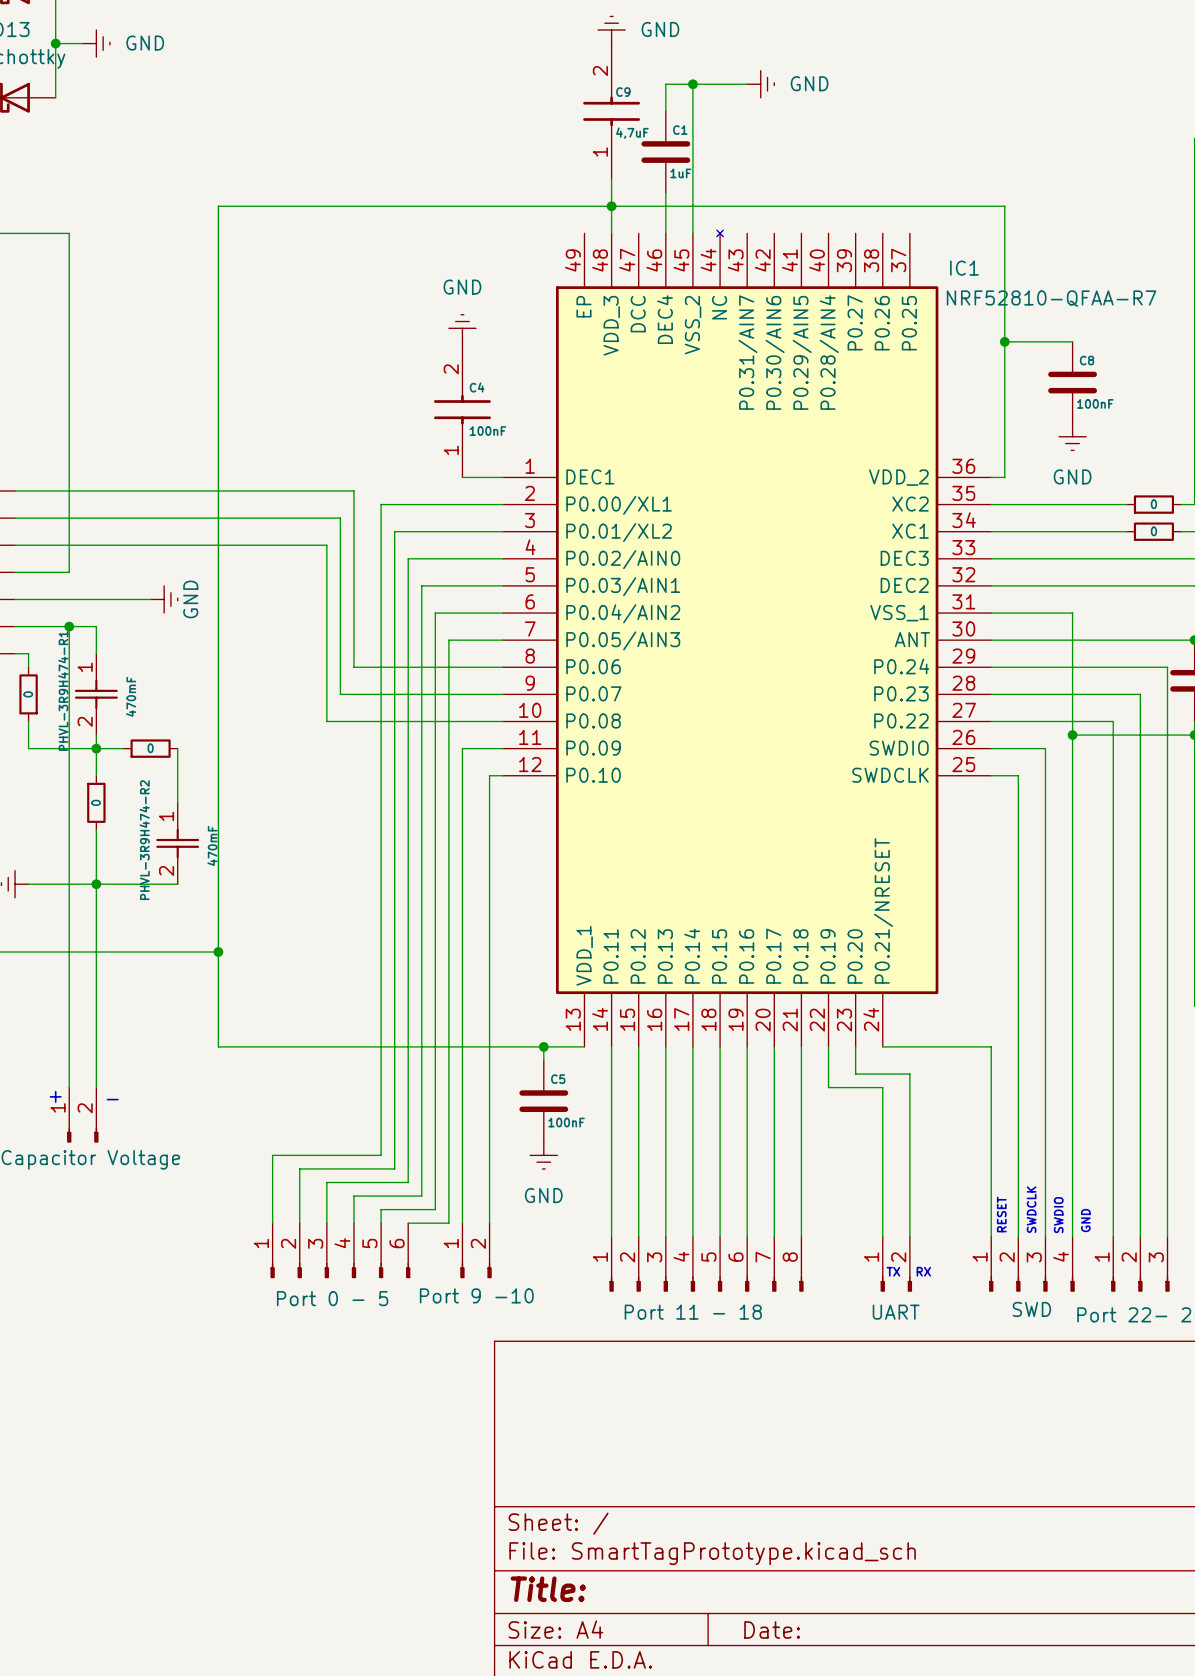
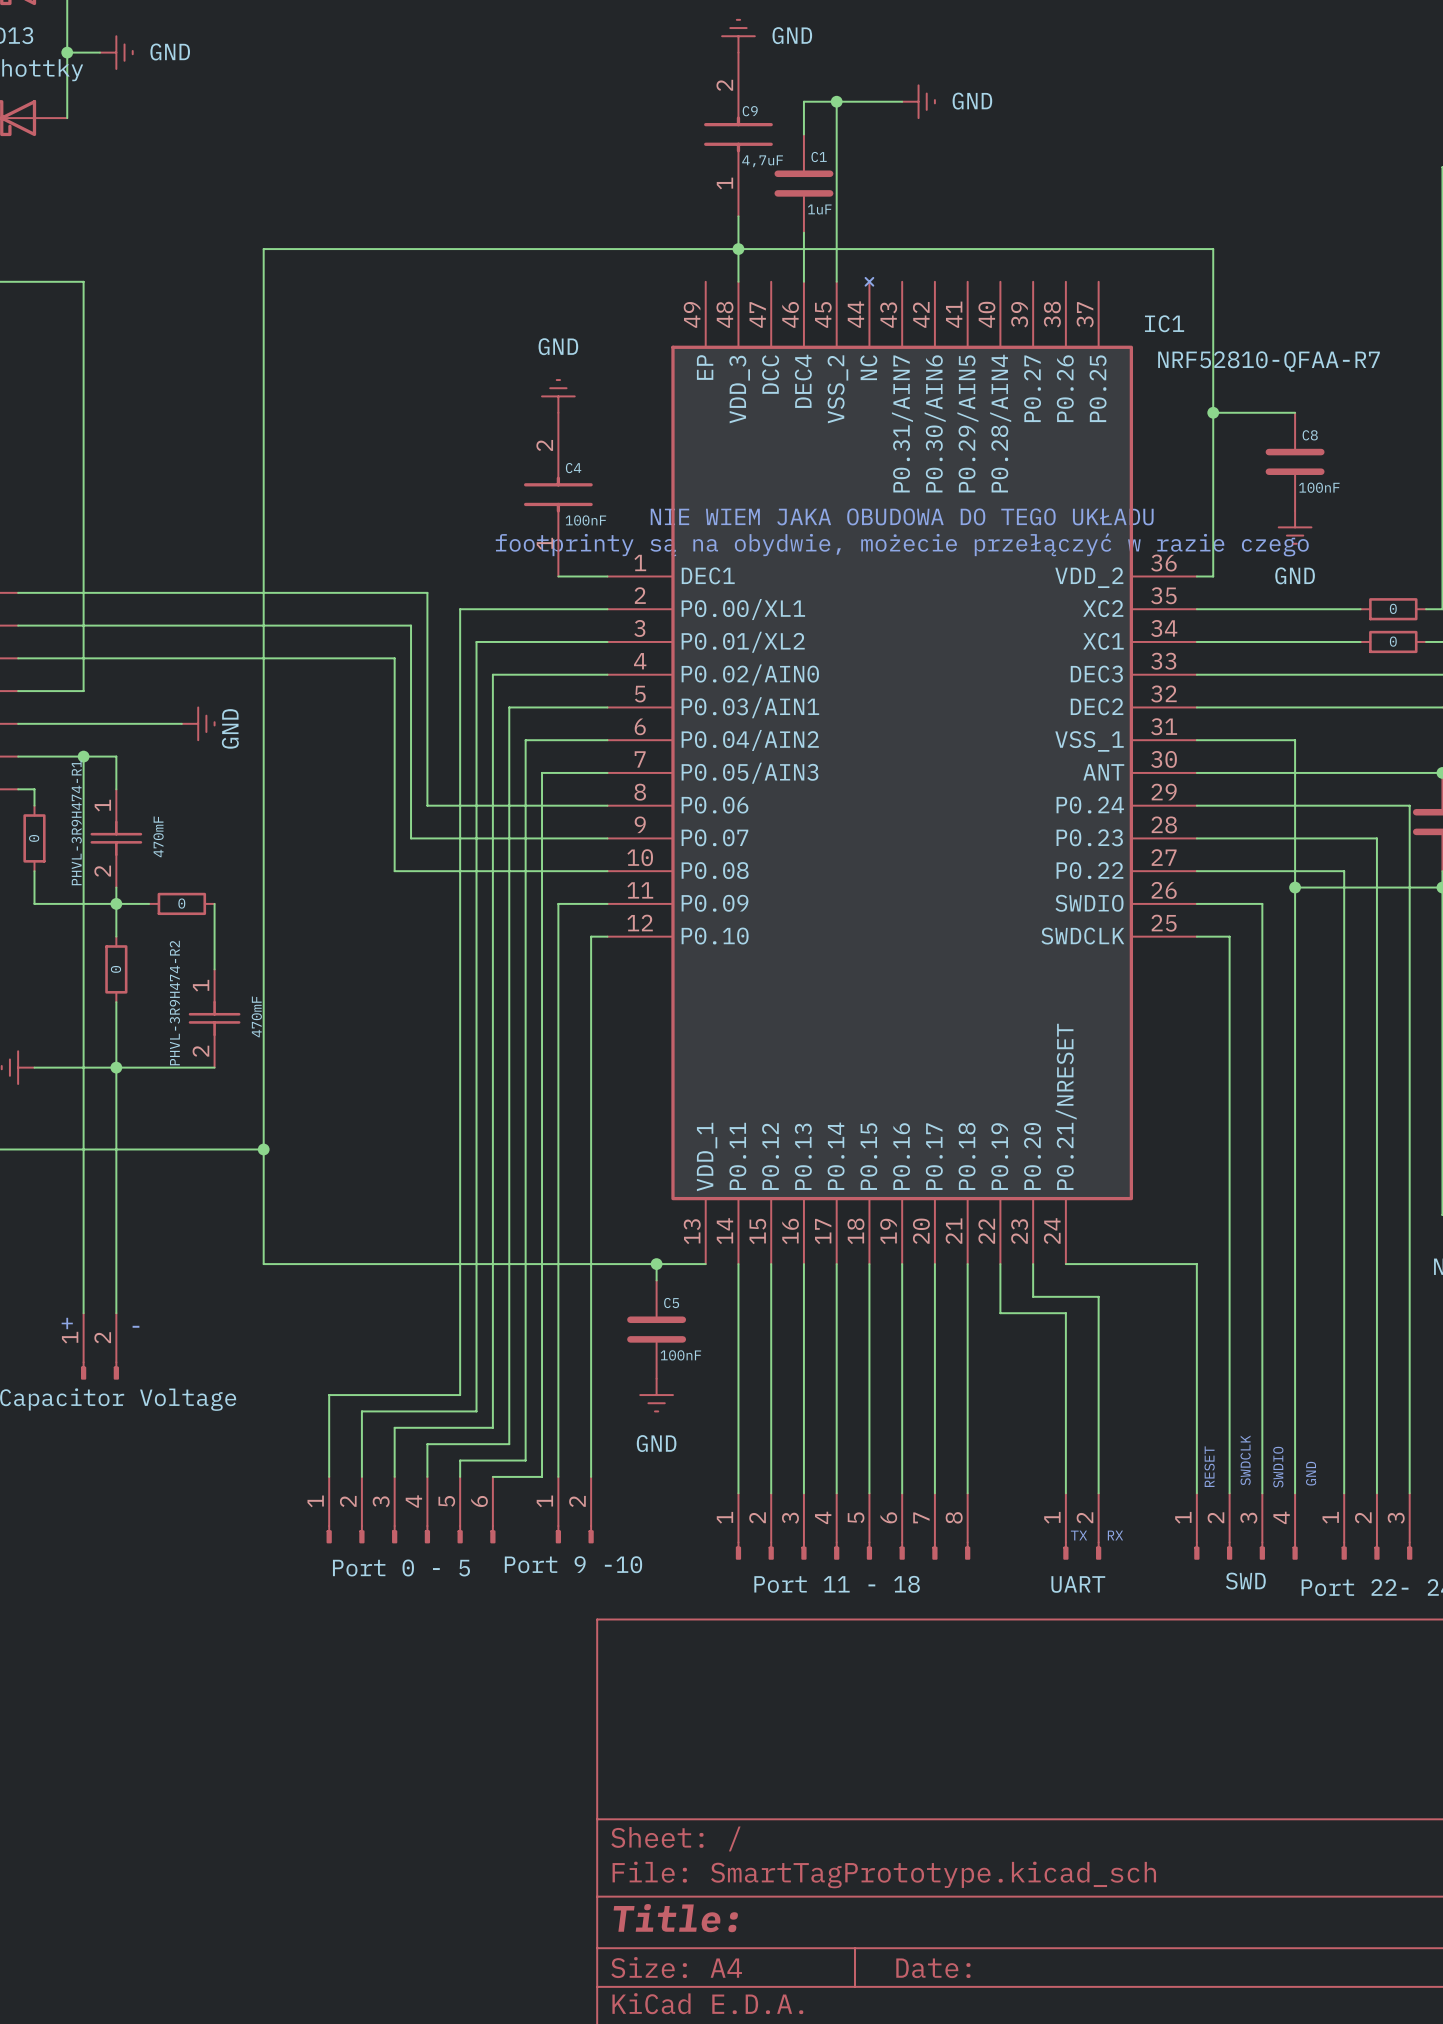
text: none -> NIE WIEM JAKA OBUDOWA DO TEGO UKŁADU (902, 516)
text: none -> footprinty są na obydwie, możecie przełączyć w razie czego (902, 544)

